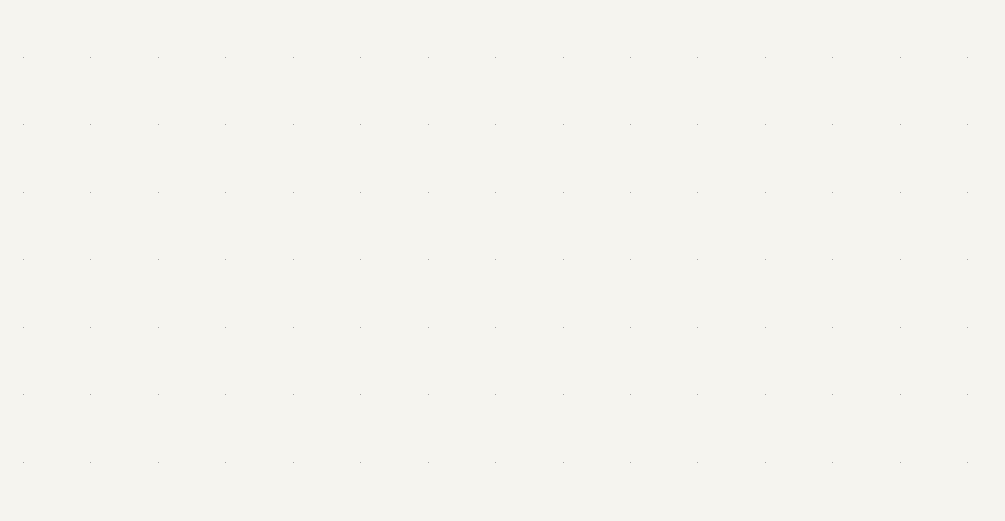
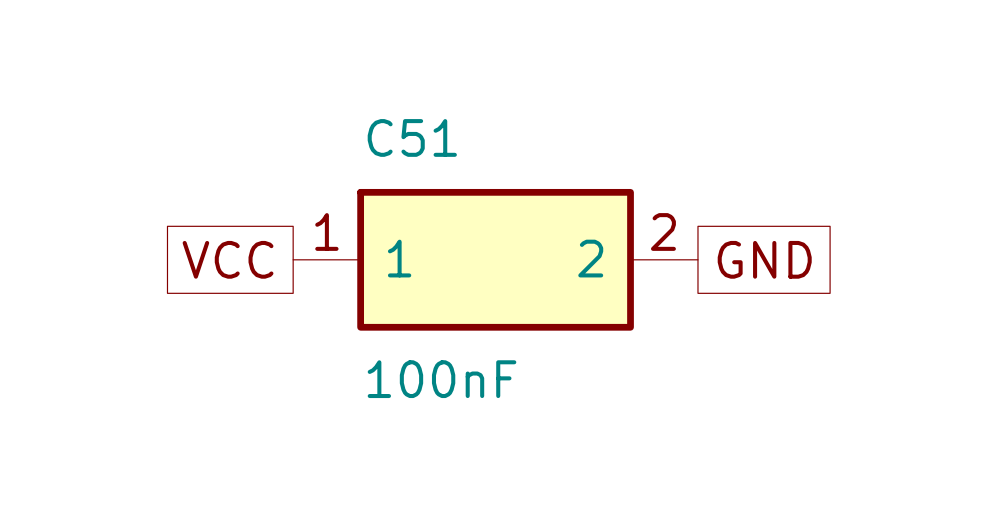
global label: none -> VCC (228, 259)
C51: none -> 100nF (495, 259)
global label: none -> GND (764, 259)

